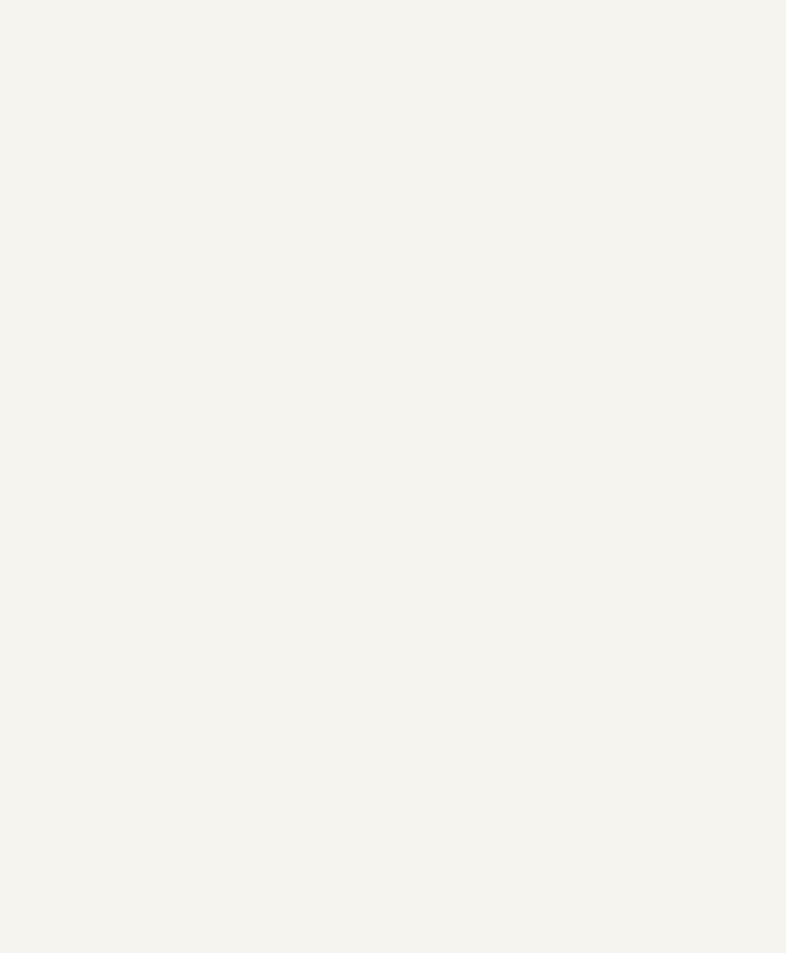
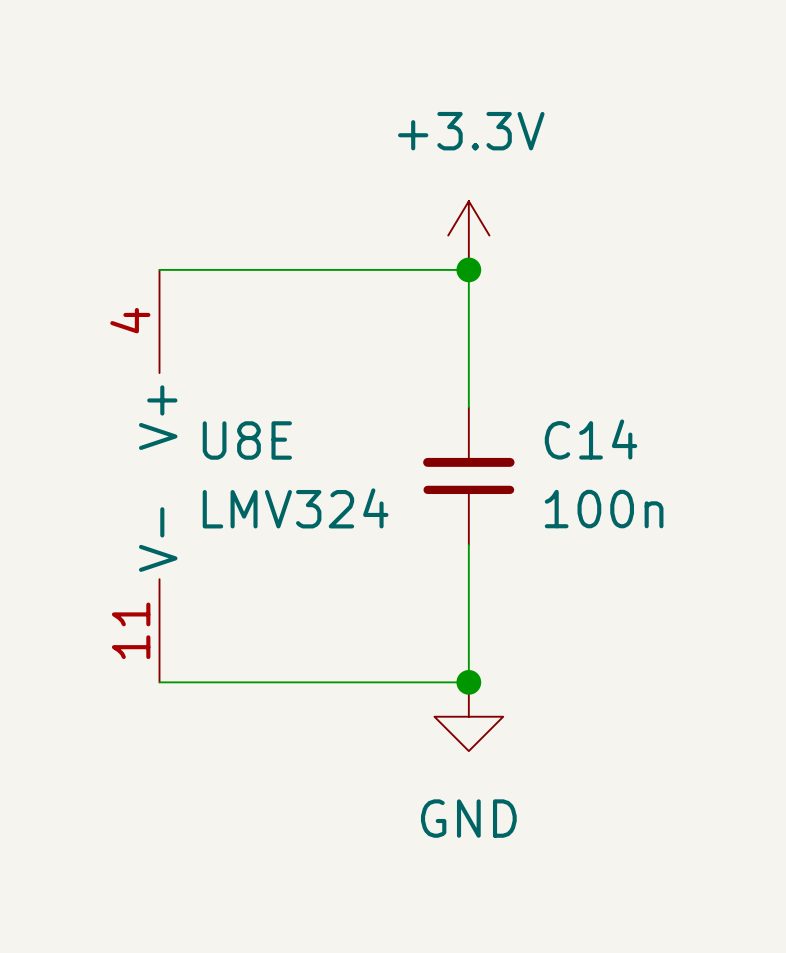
power symbol: none -> +3.3V (468, 235)
wire: none -> (159, 269) (468, 269) (468, 407)
junction: none -> (468, 269)
U8E: none -> LMV324 (159, 476)
C14: none -> 100n (468, 476)
wire: none -> (468, 544) (468, 682) (159, 682)
junction: none -> (468, 682)
power symbol: none -> GND (468, 716)

